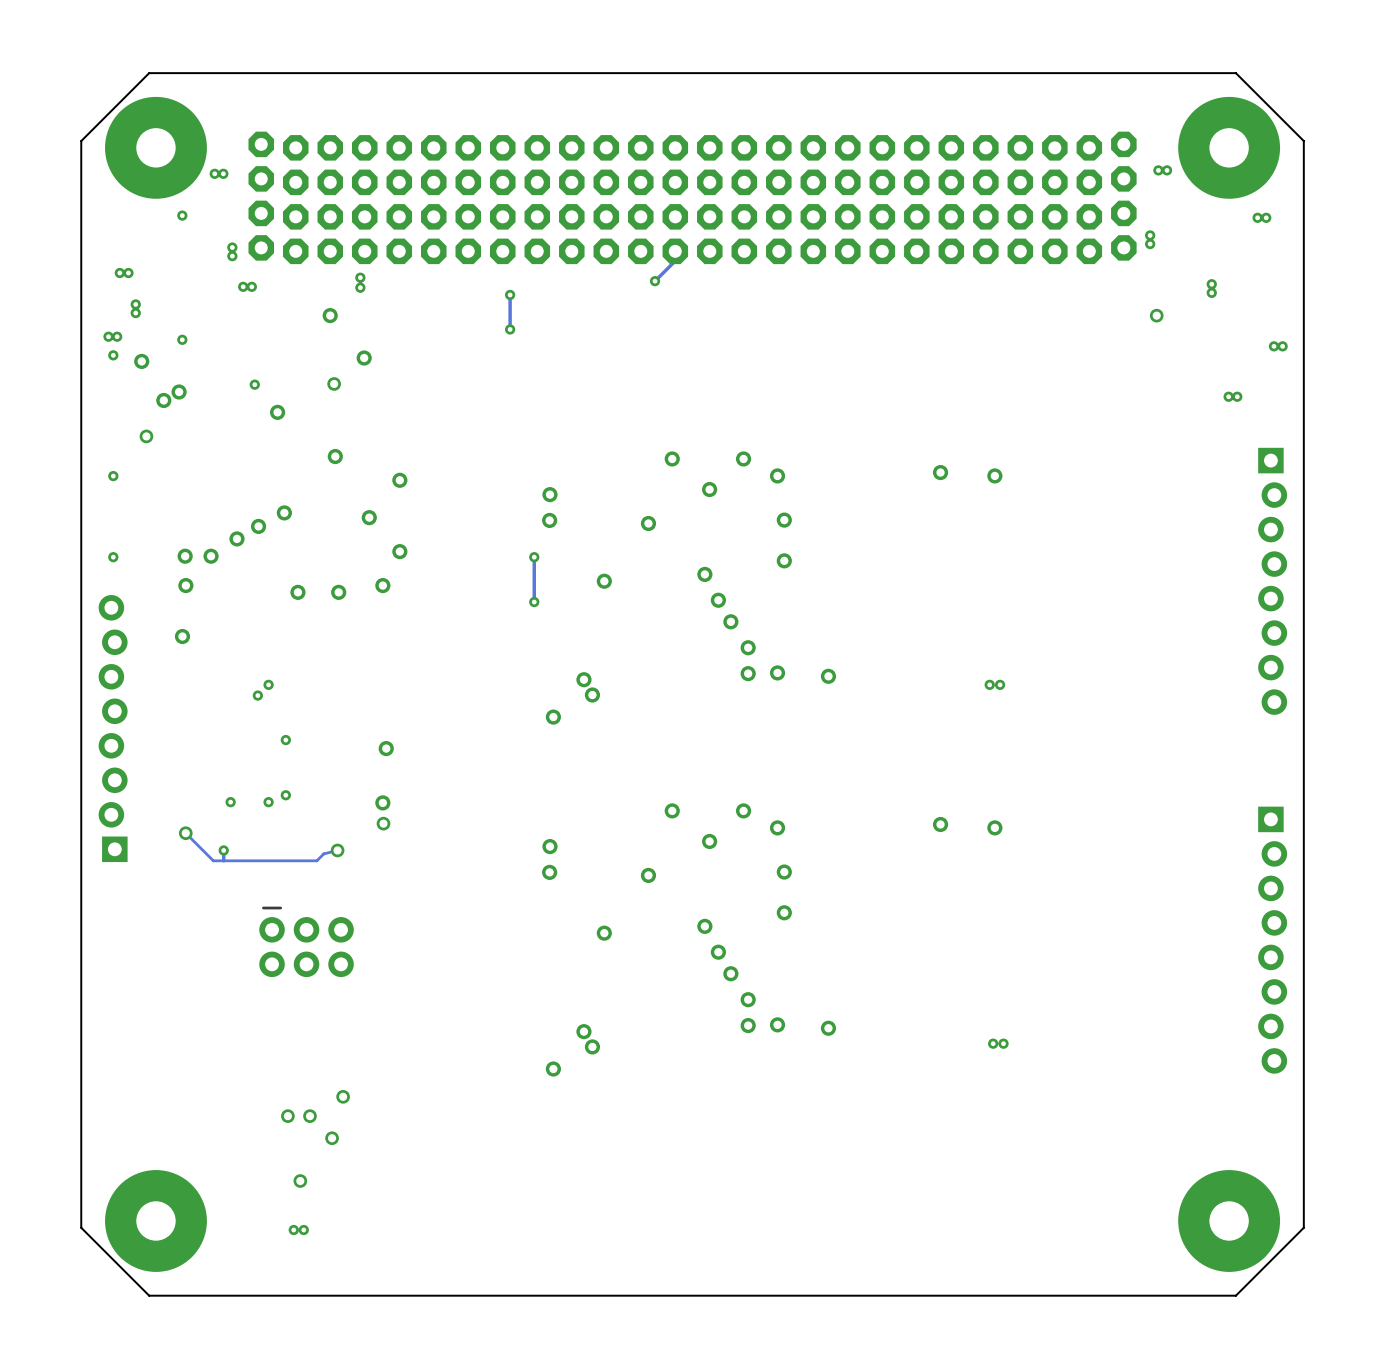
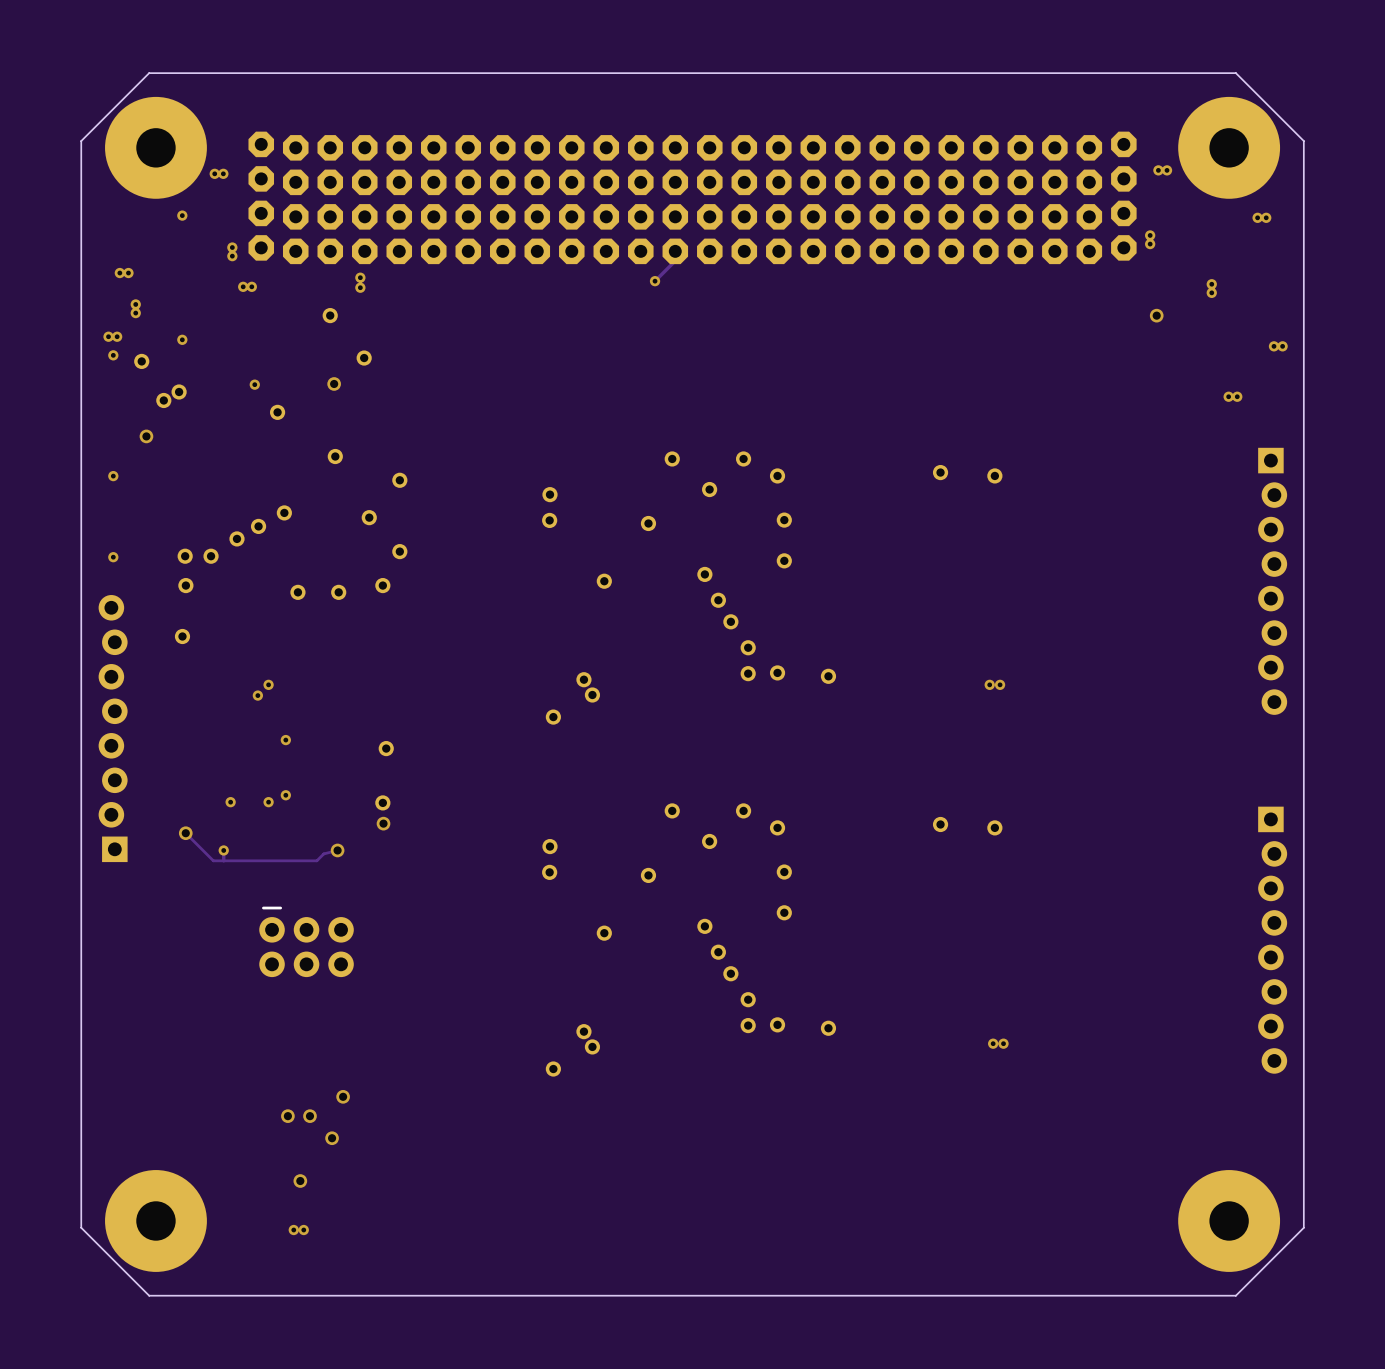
track: (510, 294) (510, 329) -> none
via: (510, 294) -> none
via: (510, 329) -> none
track: (534, 557) (534, 602) -> none
via: (534, 557) -> none
via: (534, 602) -> none

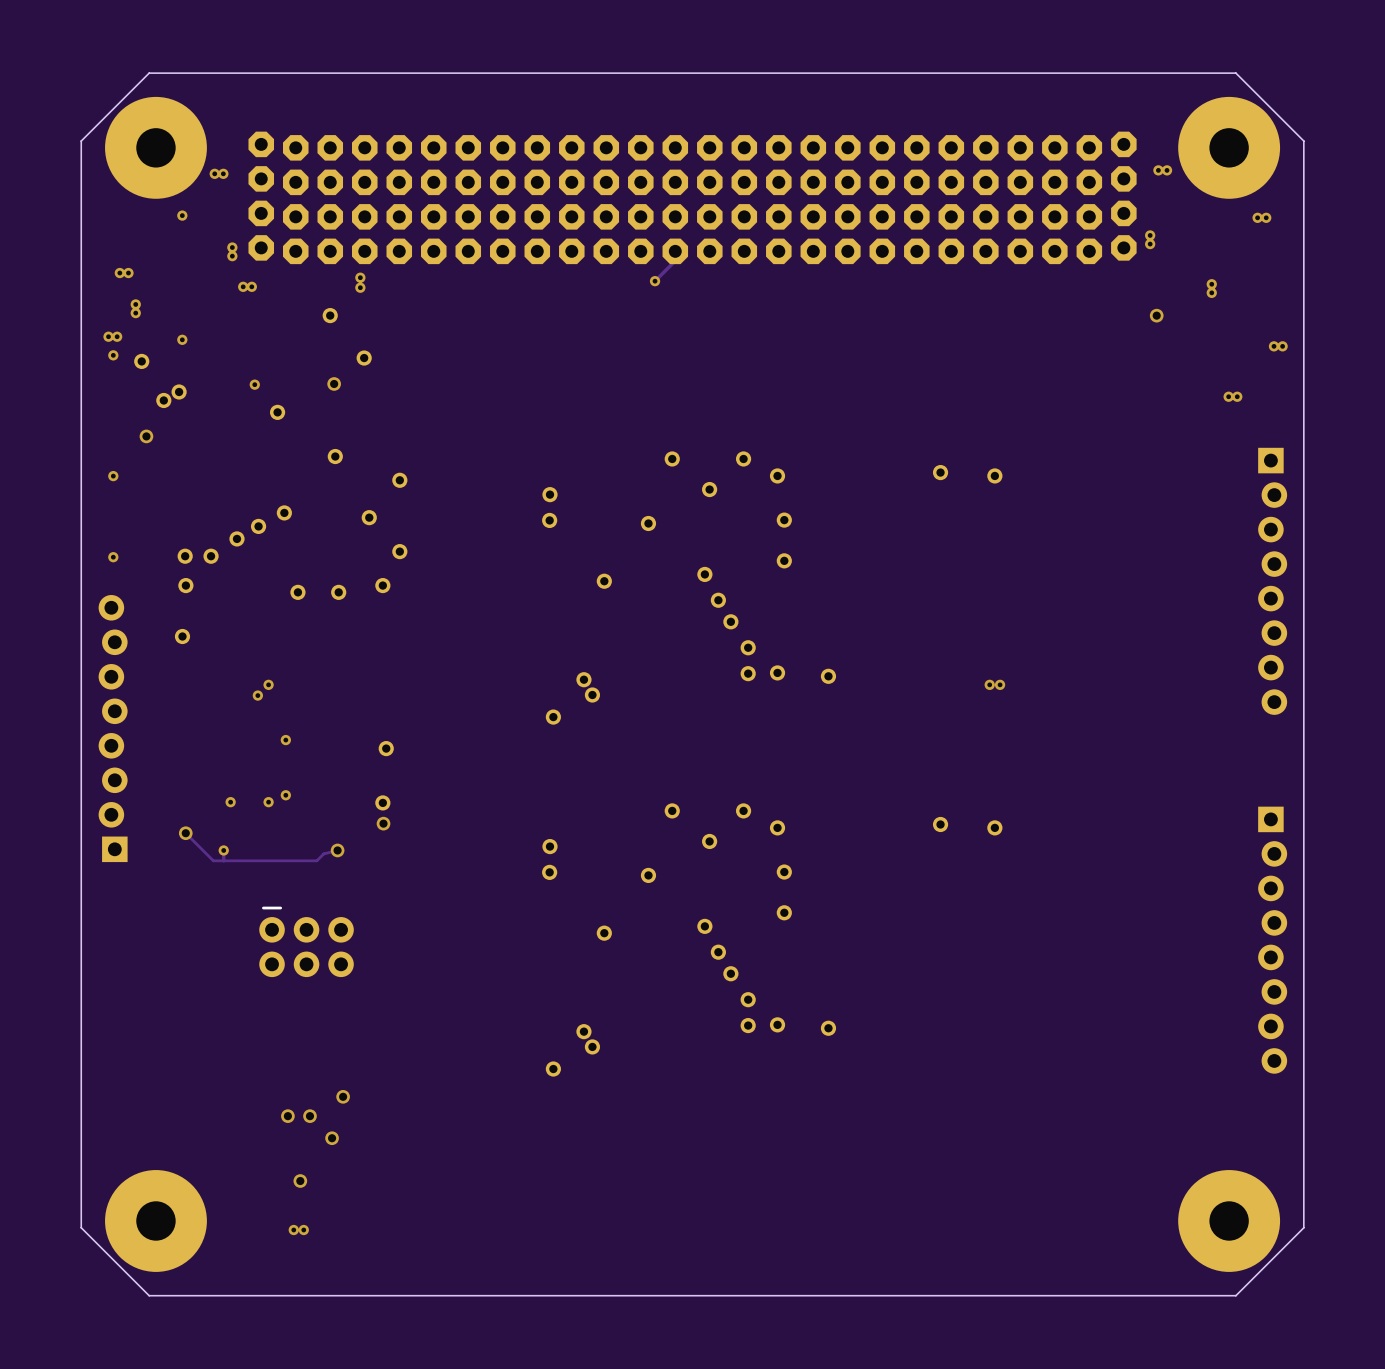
via: (993, 1043) -> none
via: (1003, 1043) -> none

